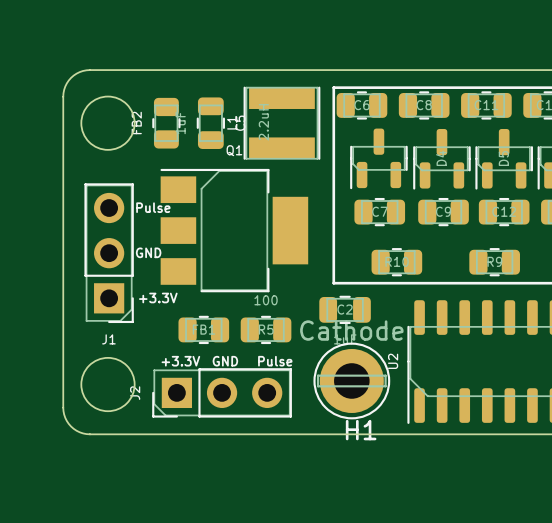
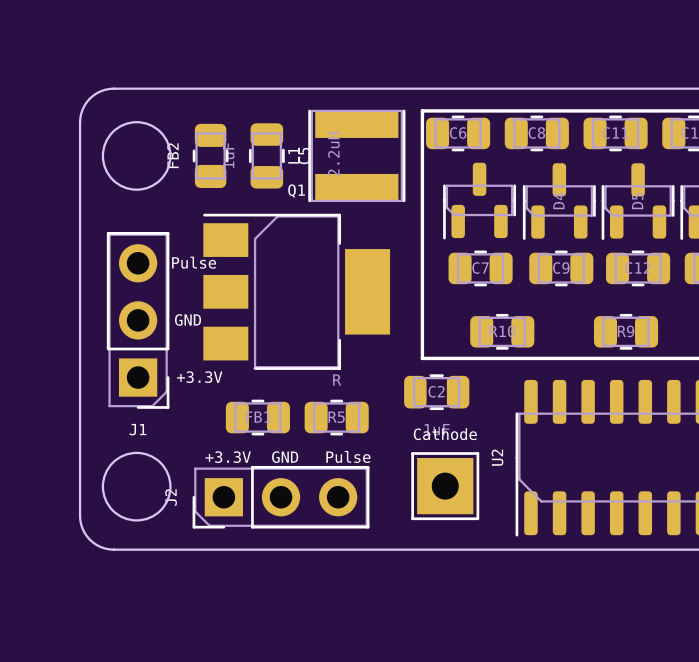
R5 value: 100 (266, 300) -> R (337, 380)
H1: Cathode (351, 380) -> none
part: none -> Cathode (445, 486)

